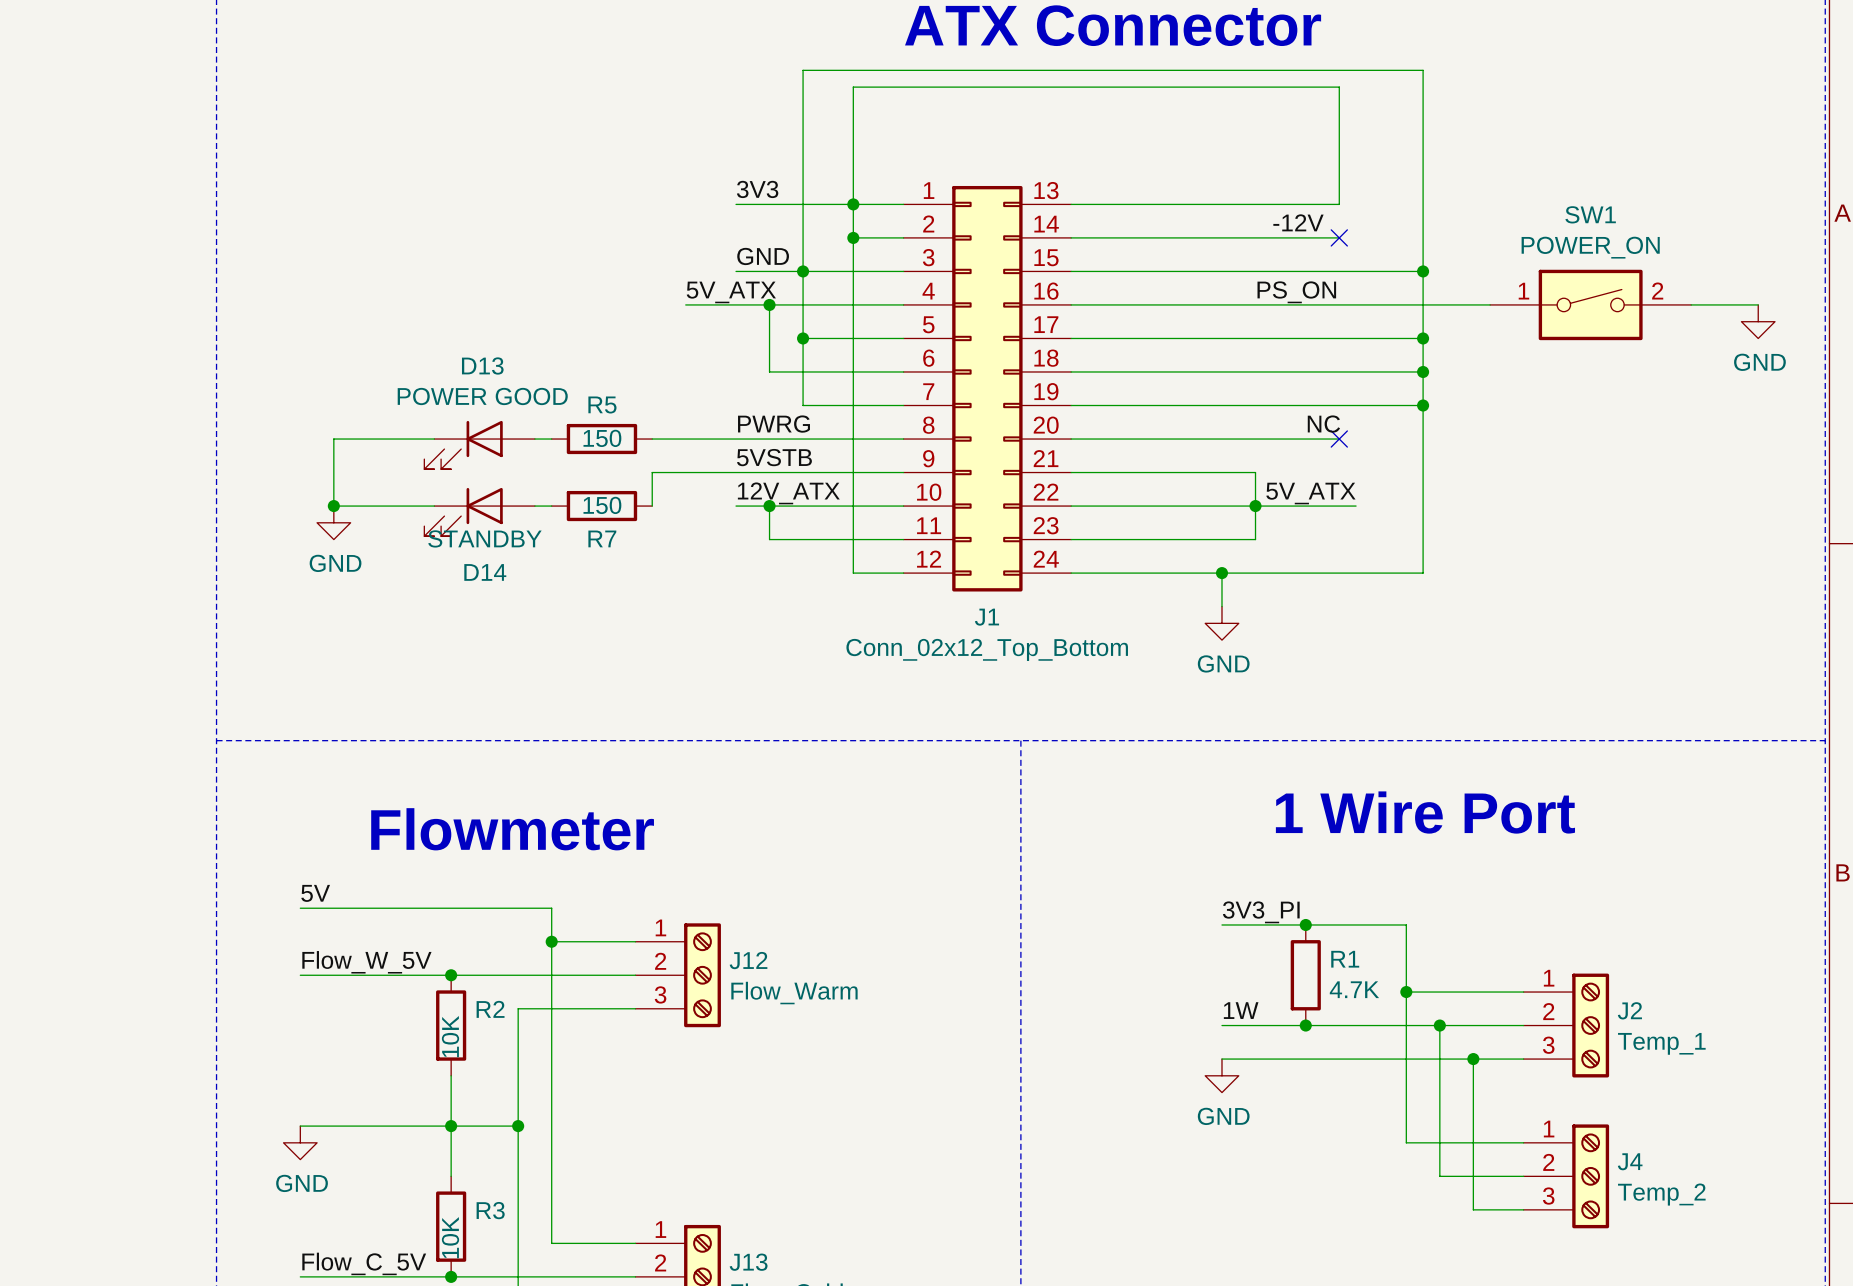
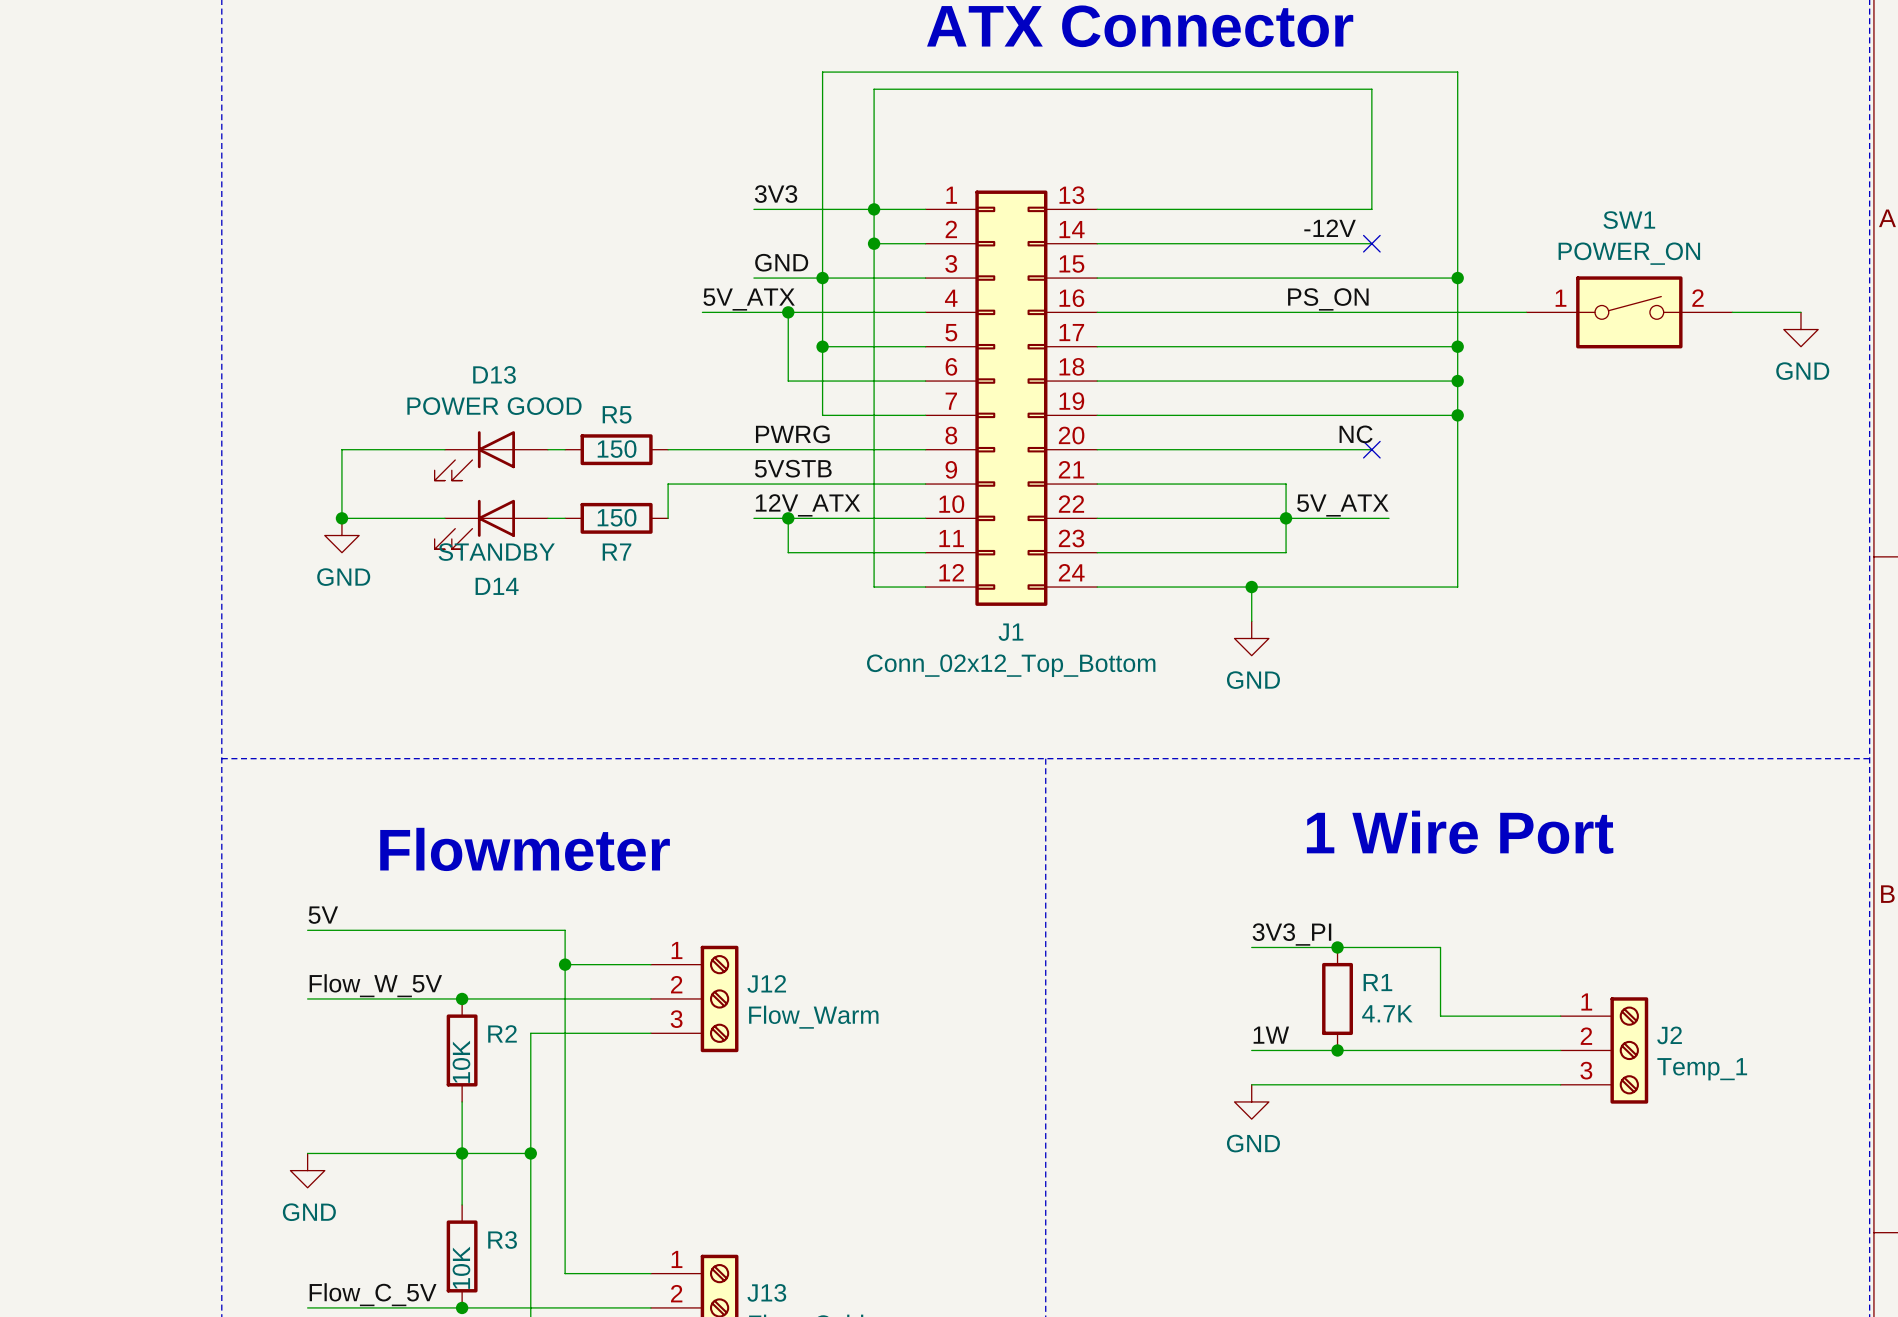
wire: (1406, 992) (1406, 1142) (1523, 1142) -> none
junction: (1406, 992) -> none
wire: (1439, 1025) (1439, 1176) (1523, 1176) -> none
junction: (1439, 1025) -> none
wire: (1473, 1059) (1473, 1209) (1523, 1209) -> none
junction: (1473, 1059) -> none
J4: Temp_2 (1566, 1176) -> none

